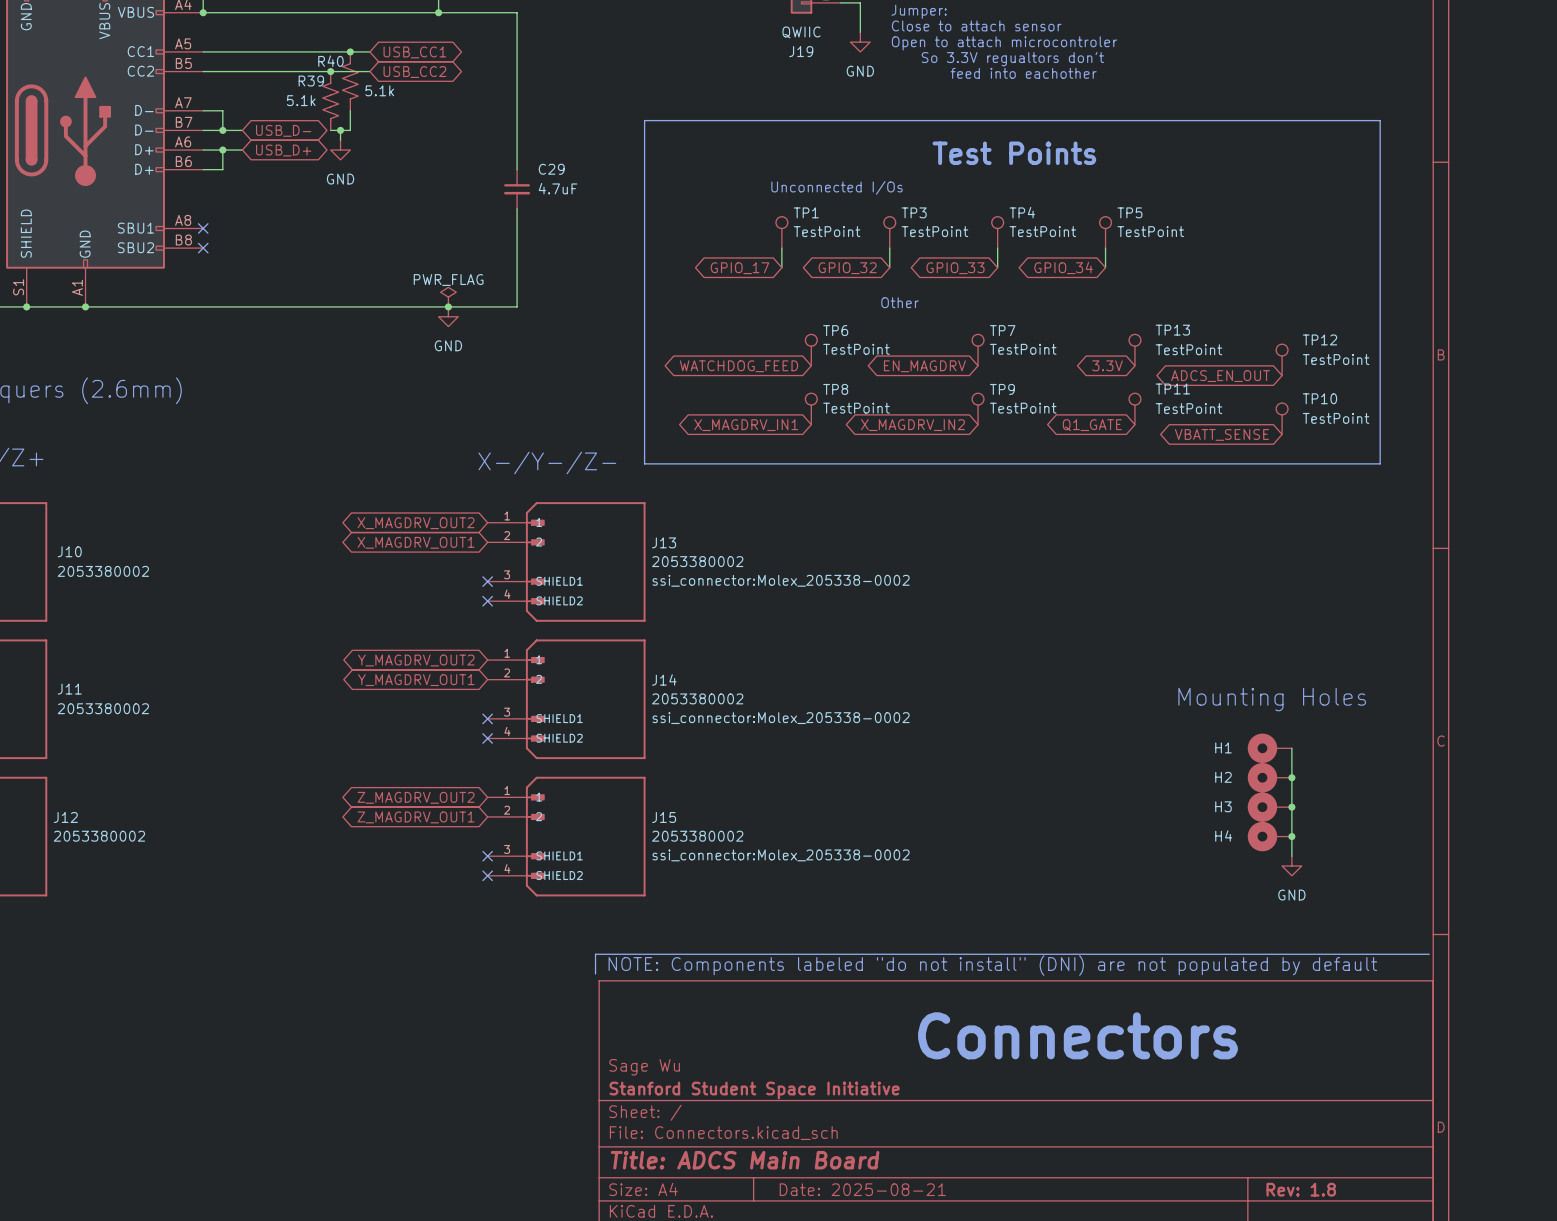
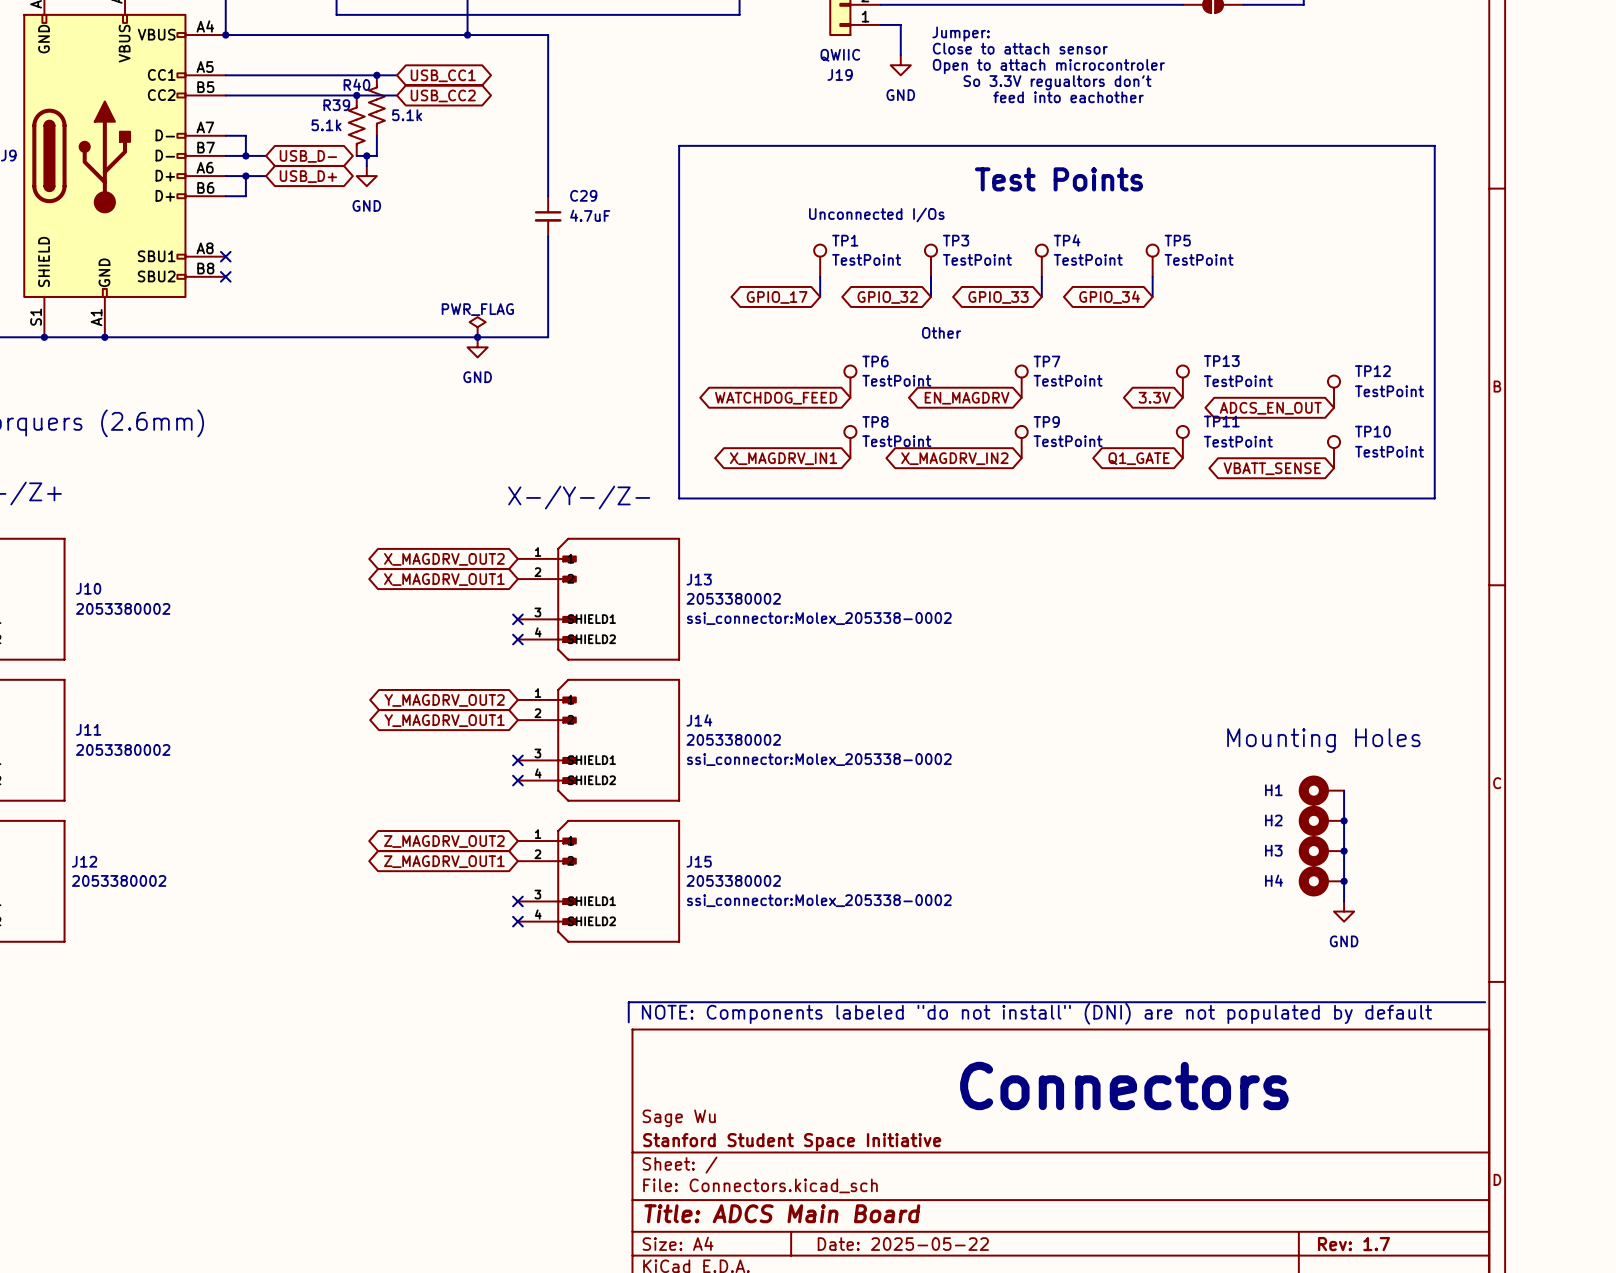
title block: Date: 2025-08-21 (862, 1189) -> Date: 2025-05-22 (903, 1244)
title block: Rev: 1.8 (1301, 1189) -> Rev: 1.7 (1353, 1244)

